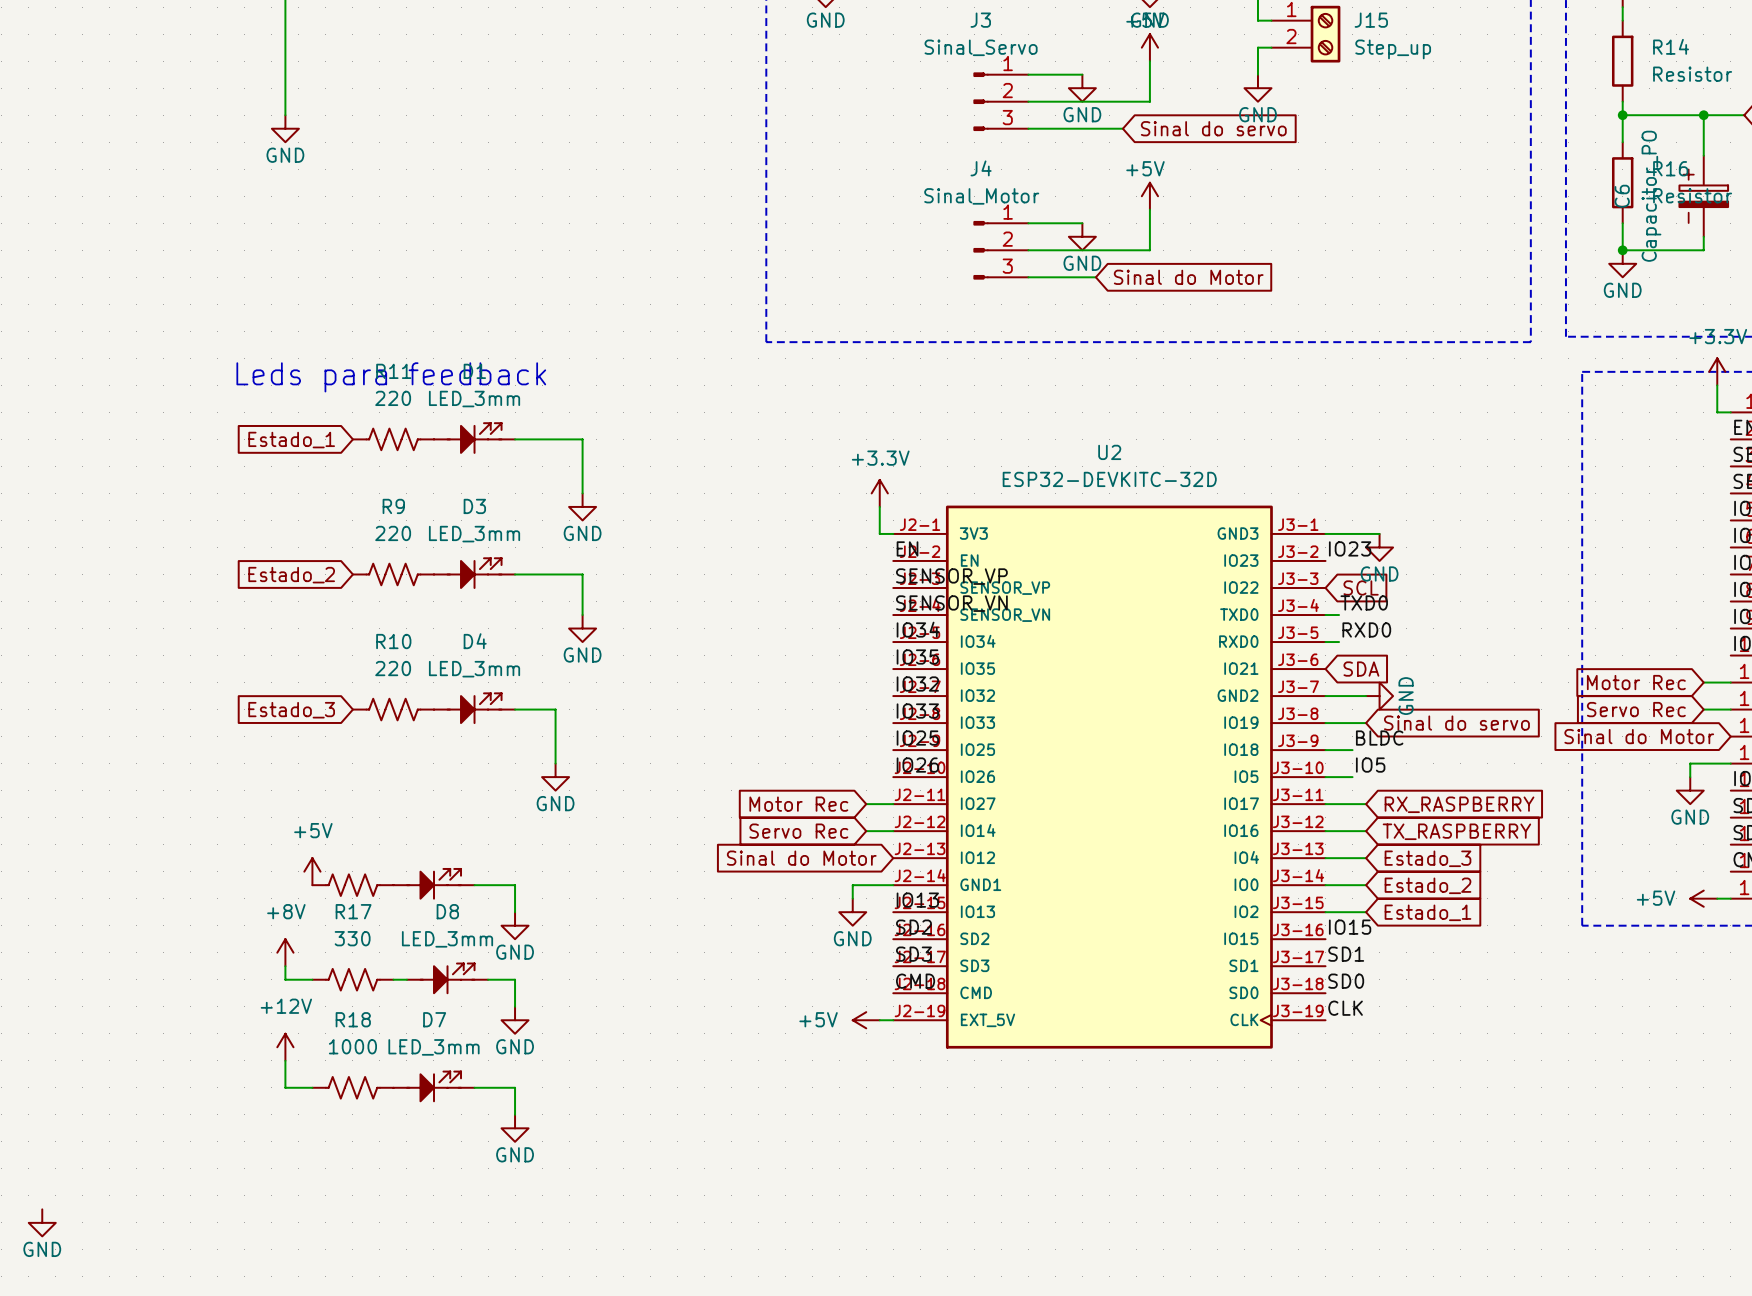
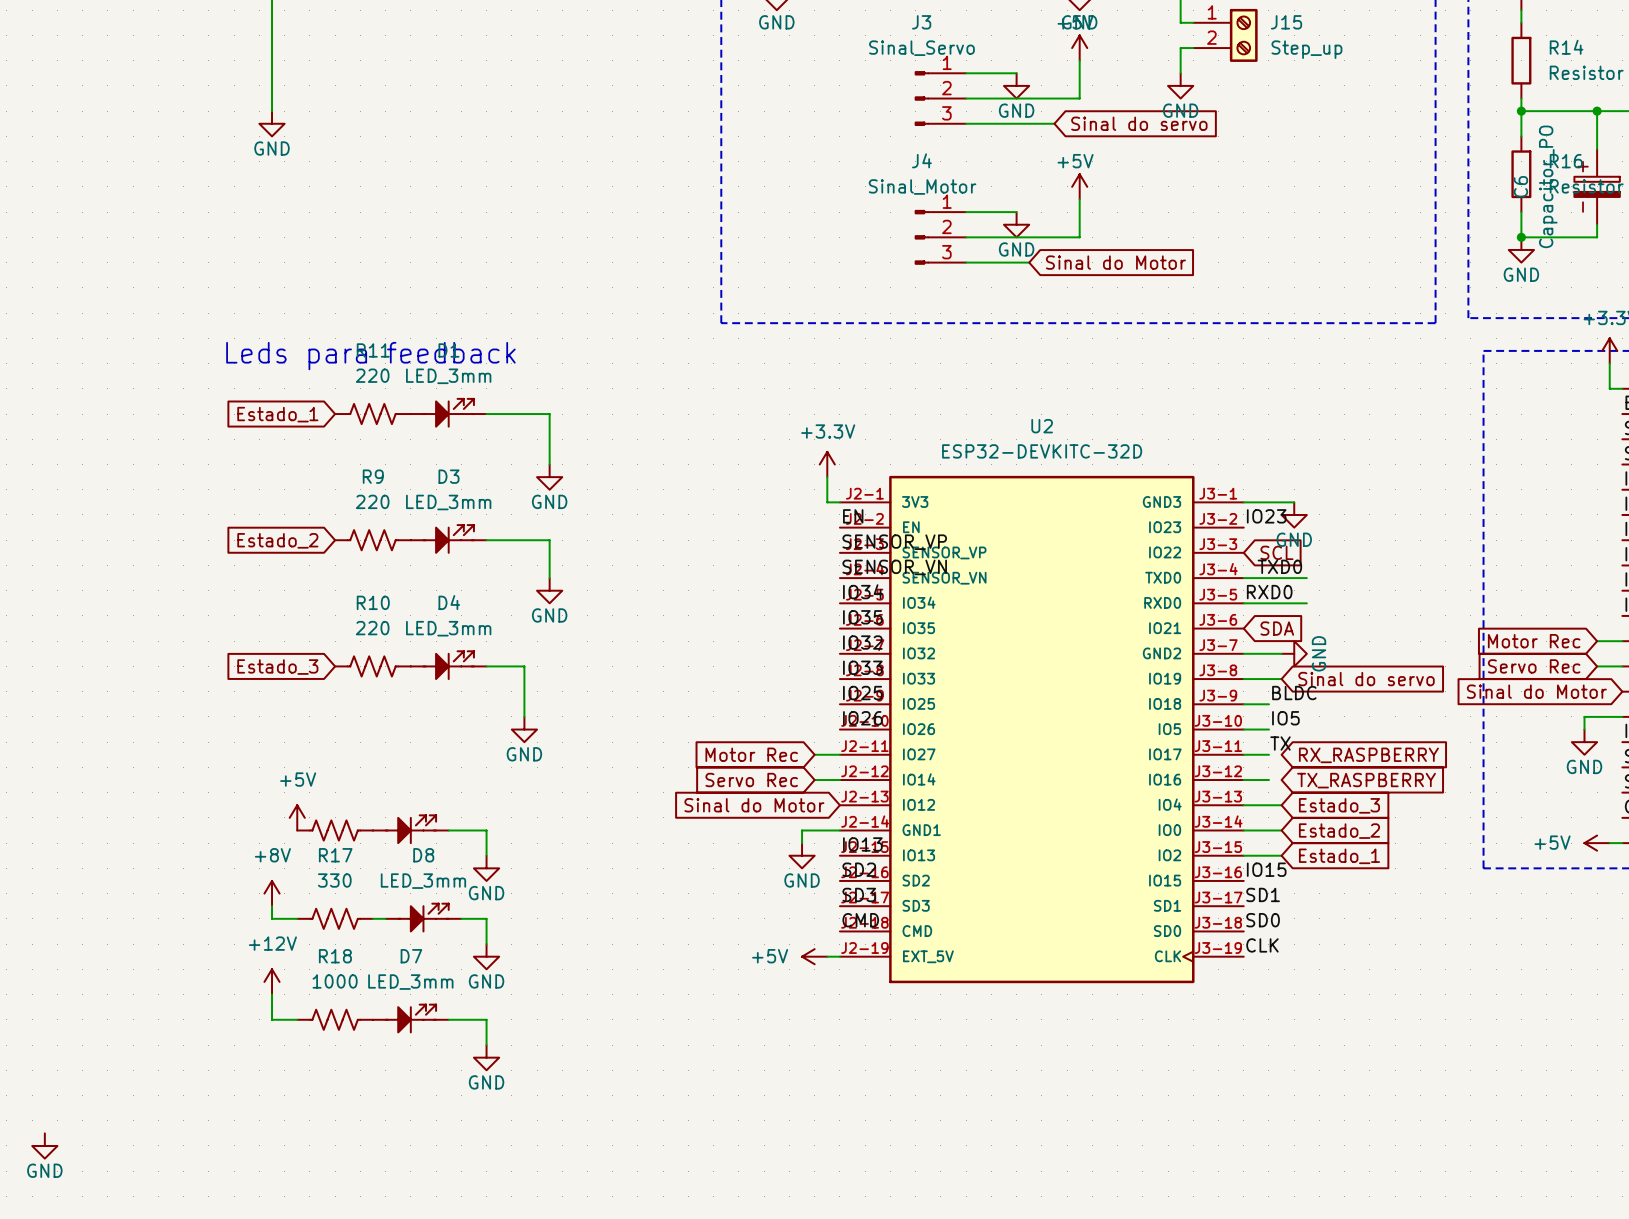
wire: none -> (1256, 578) (1306, 578)
label position: RXD0 (1366, 629) -> RXD0 (1269, 592)
wire: none -> (1256, 603) (1306, 603)
label: none -> TX (1280, 743)
wire: (1352, 804) (1366, 804) -> none
wire: (1352, 831) (1366, 831) -> none

